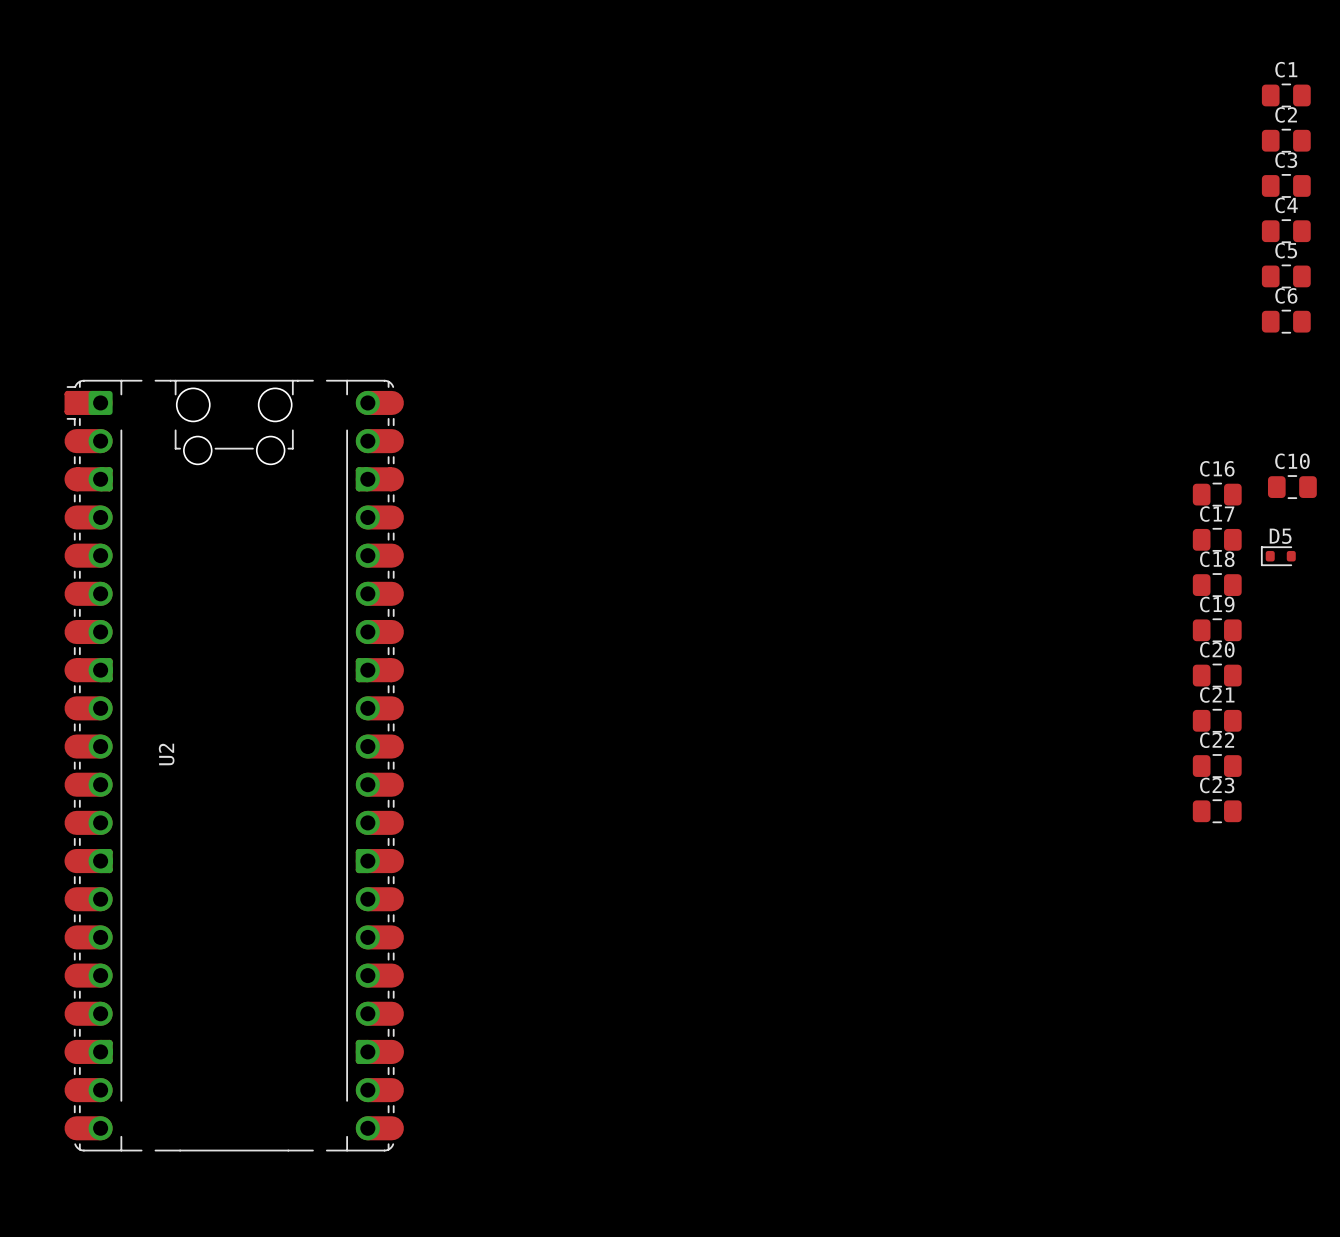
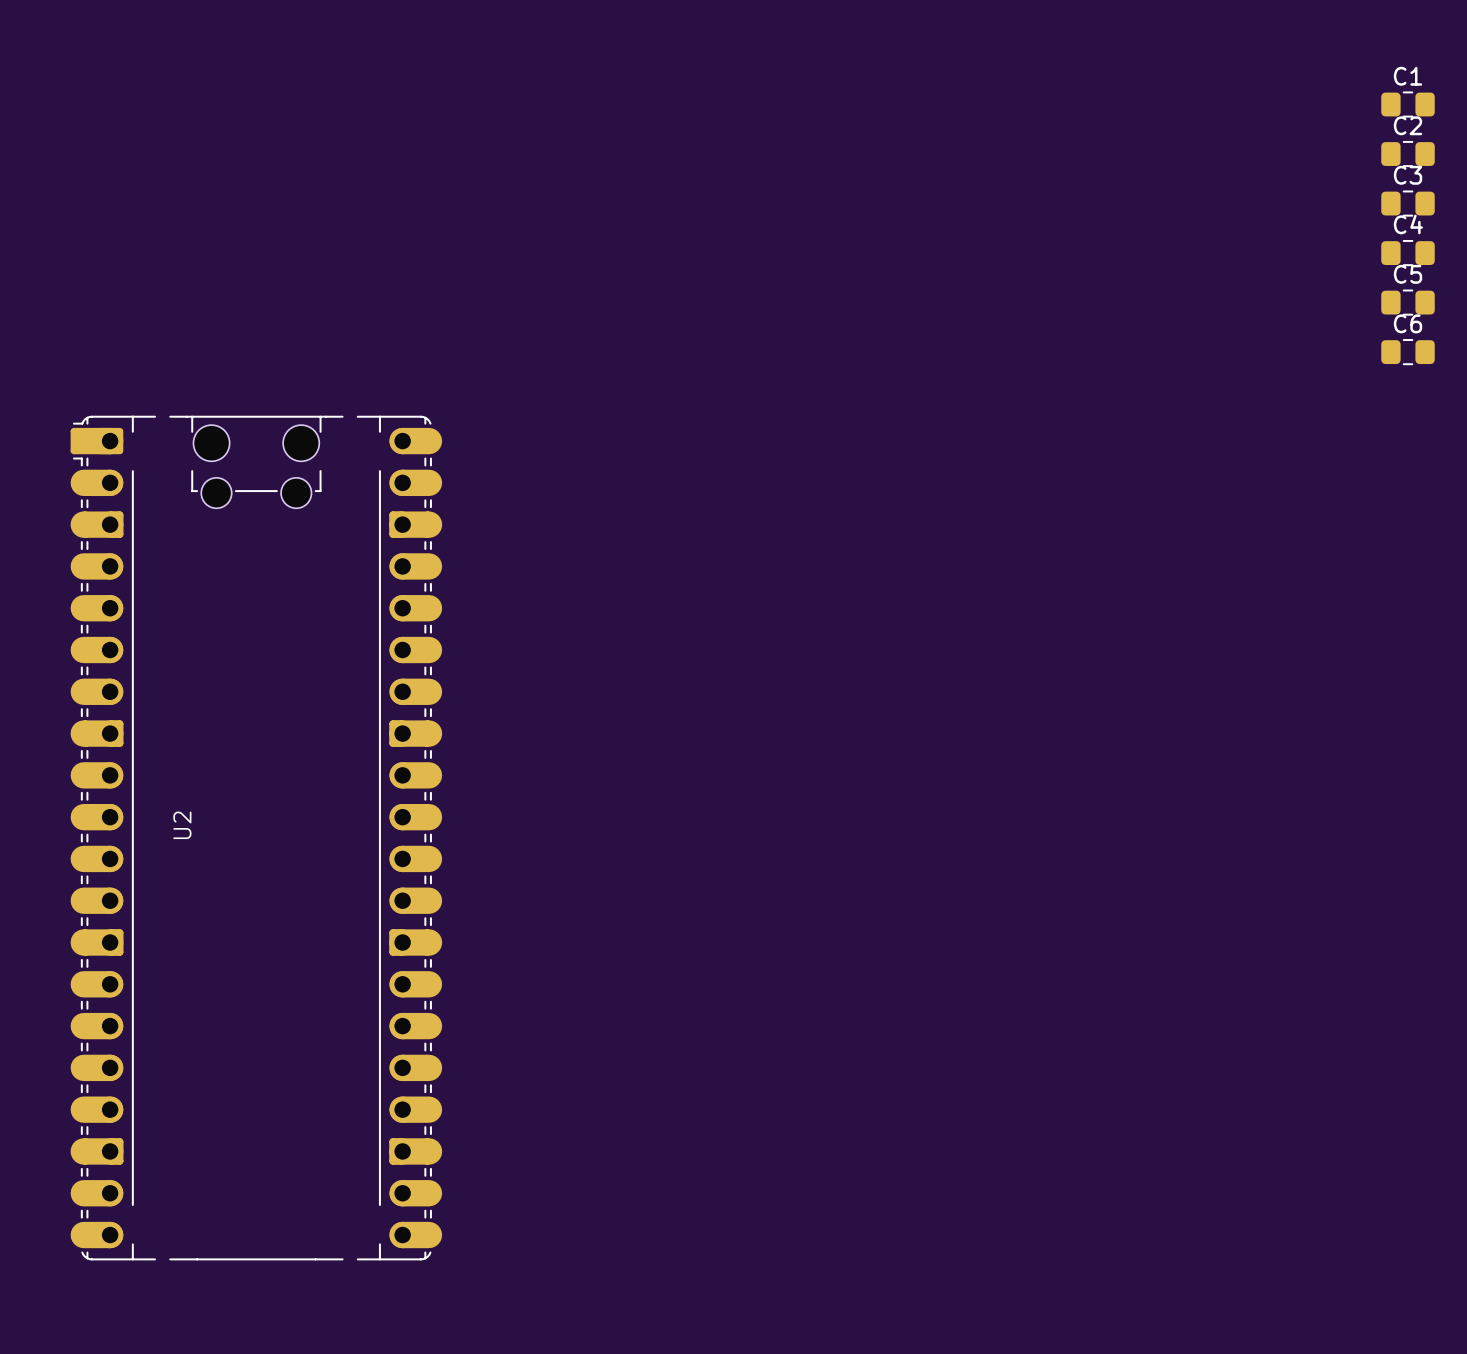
C10: (1292, 487) -> none
C16: (1217, 494) -> none
C17: (1217, 539) -> none
D5: (1278, 556) -> none
C18: (1217, 585) -> none
C19: (1217, 630) -> none
C20: (1217, 675) -> none
C21: (1217, 720) -> none
C22: (1217, 766) -> none
C23: (1217, 811) -> none

